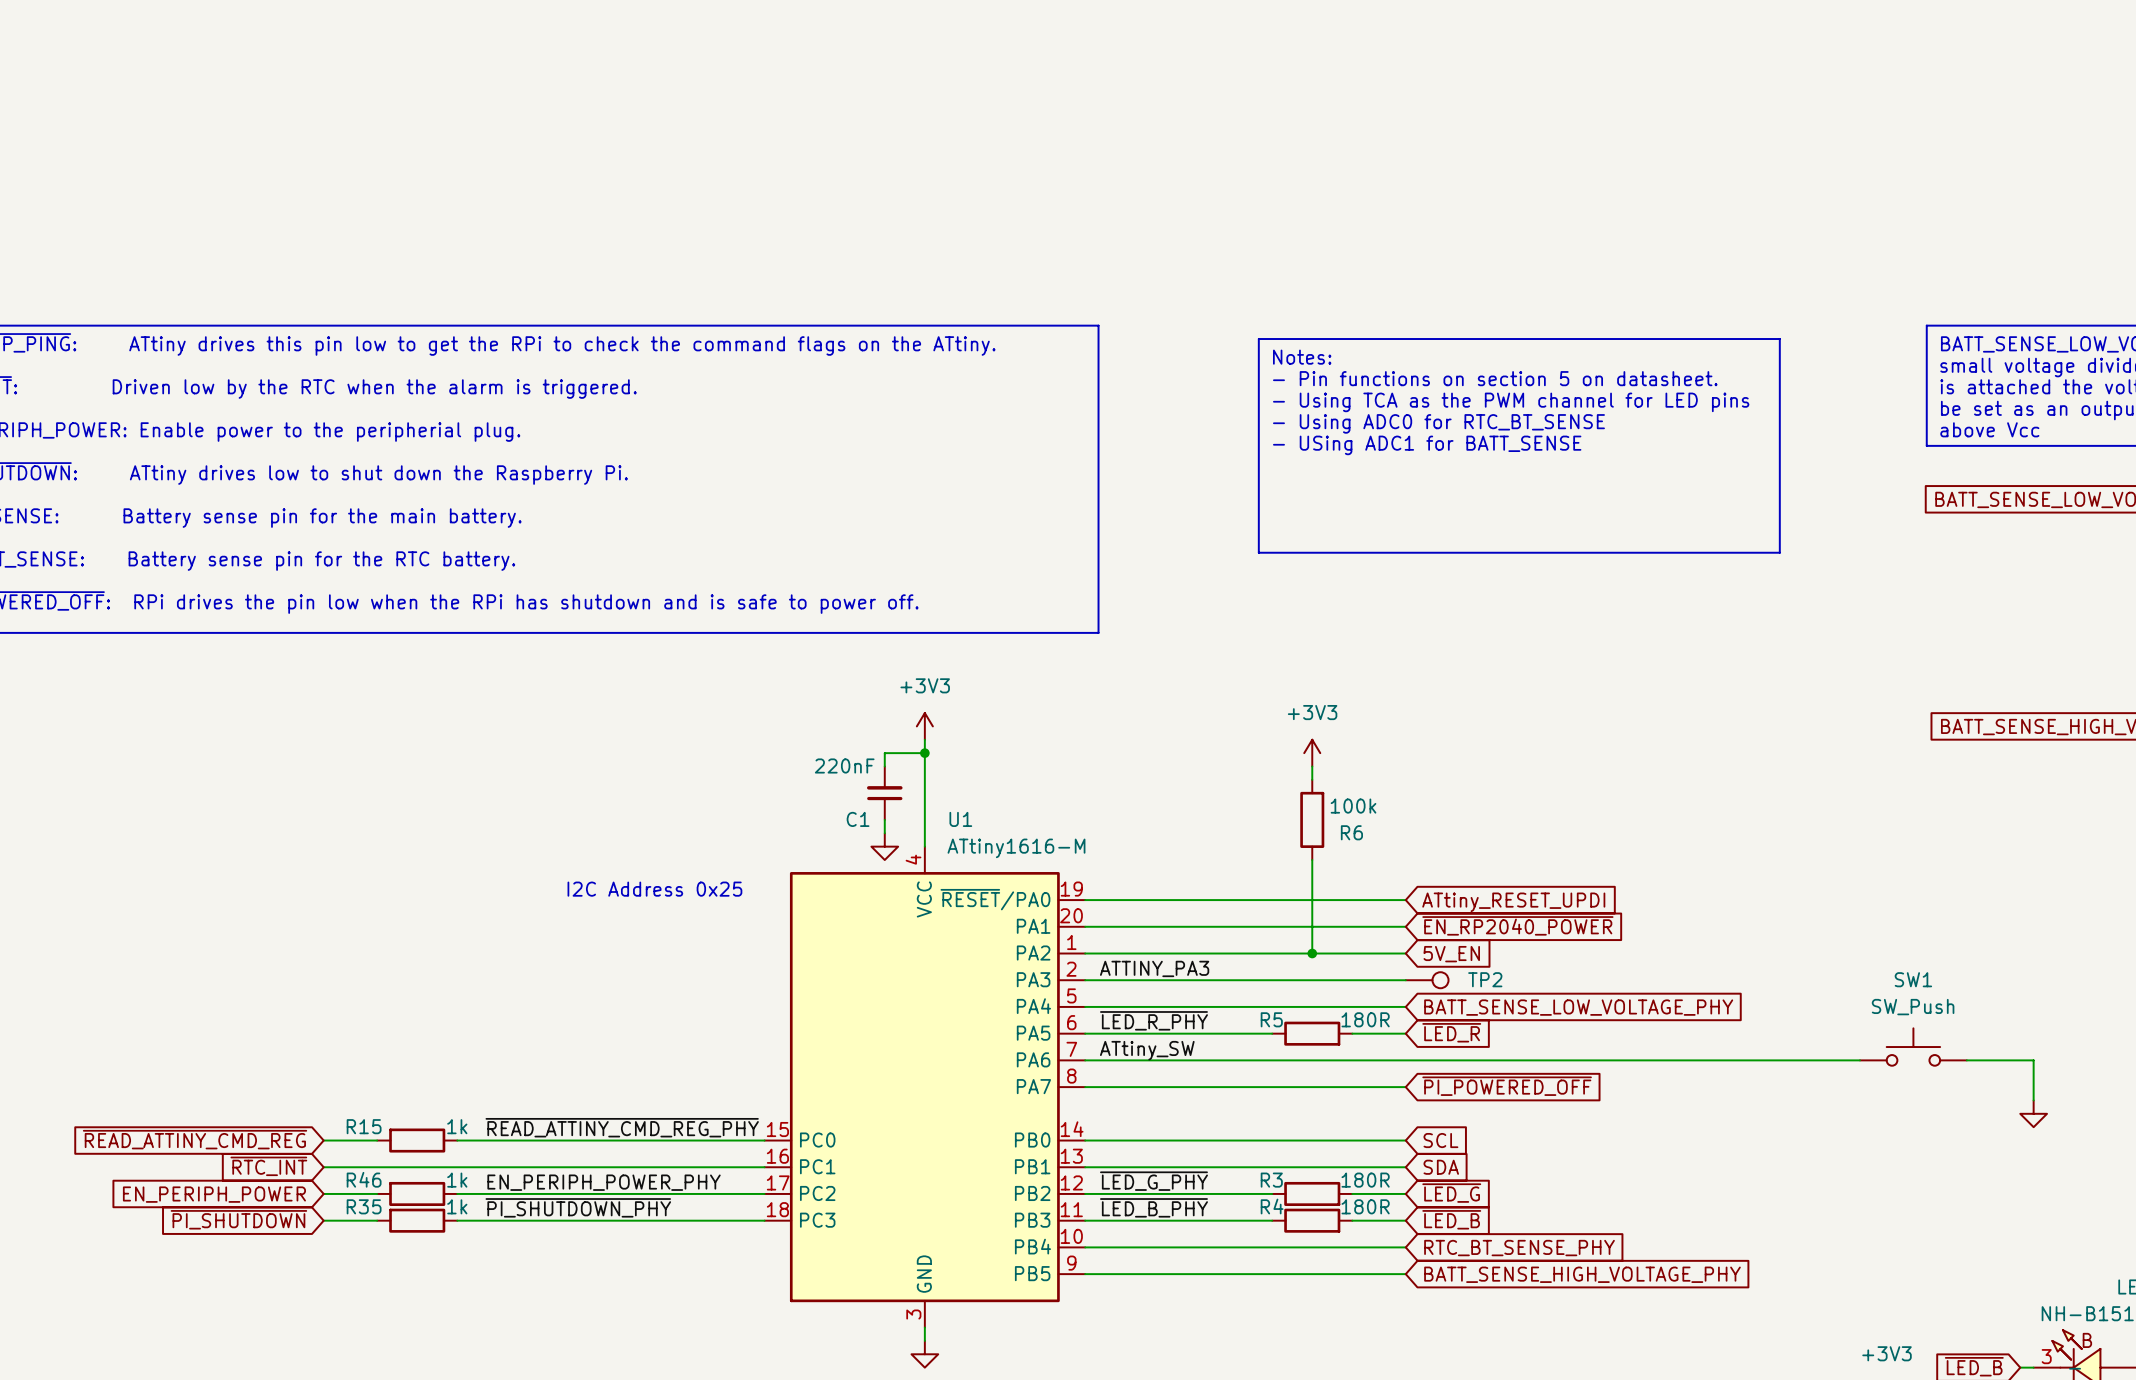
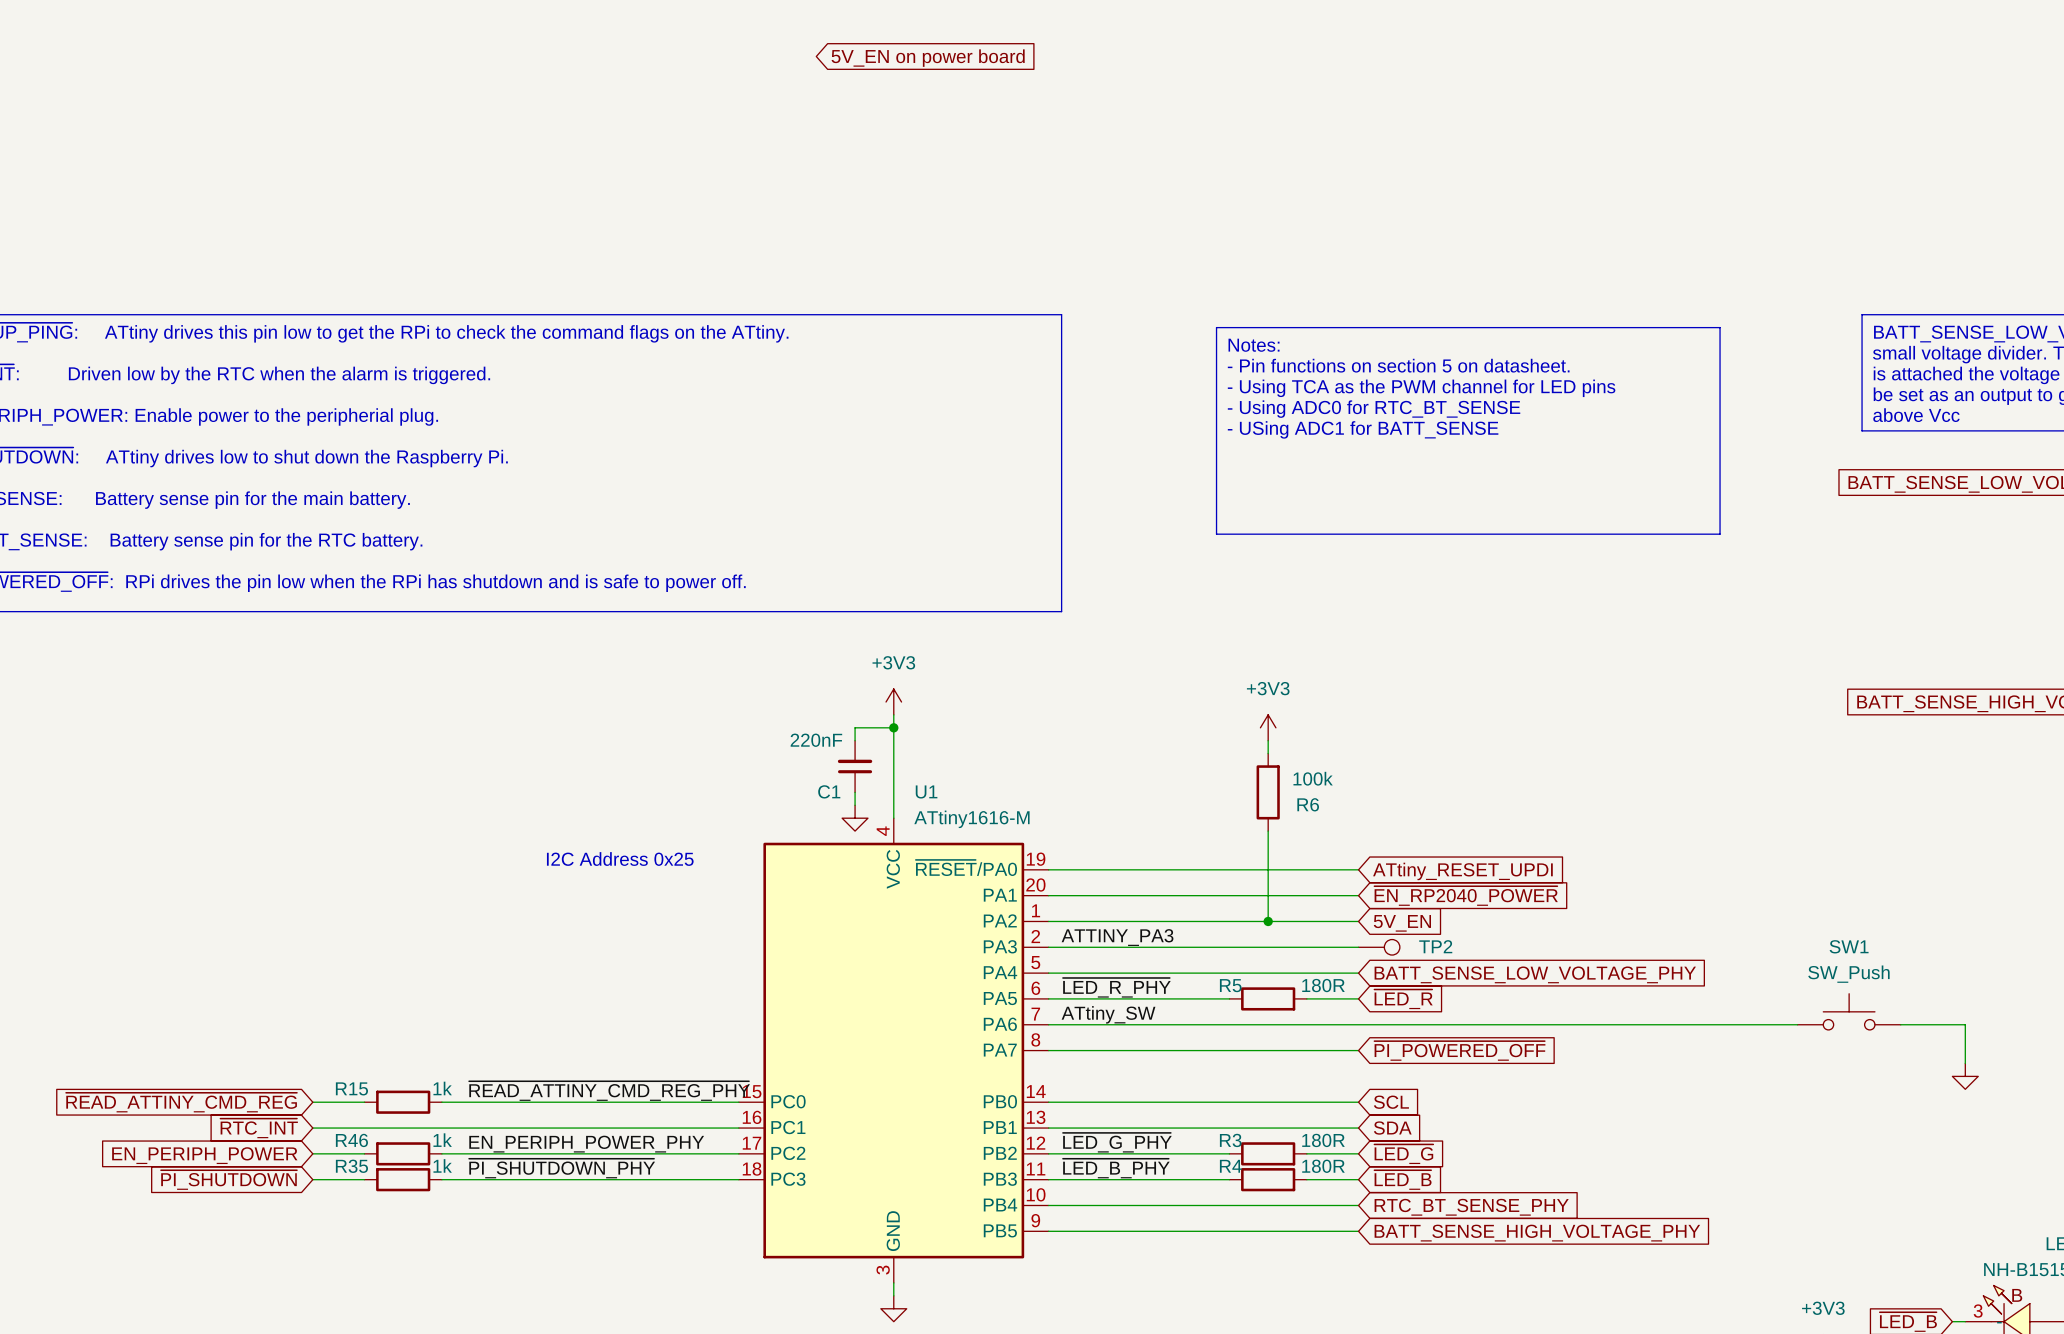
global label: none -> 5V_EN on power board (928, 58)

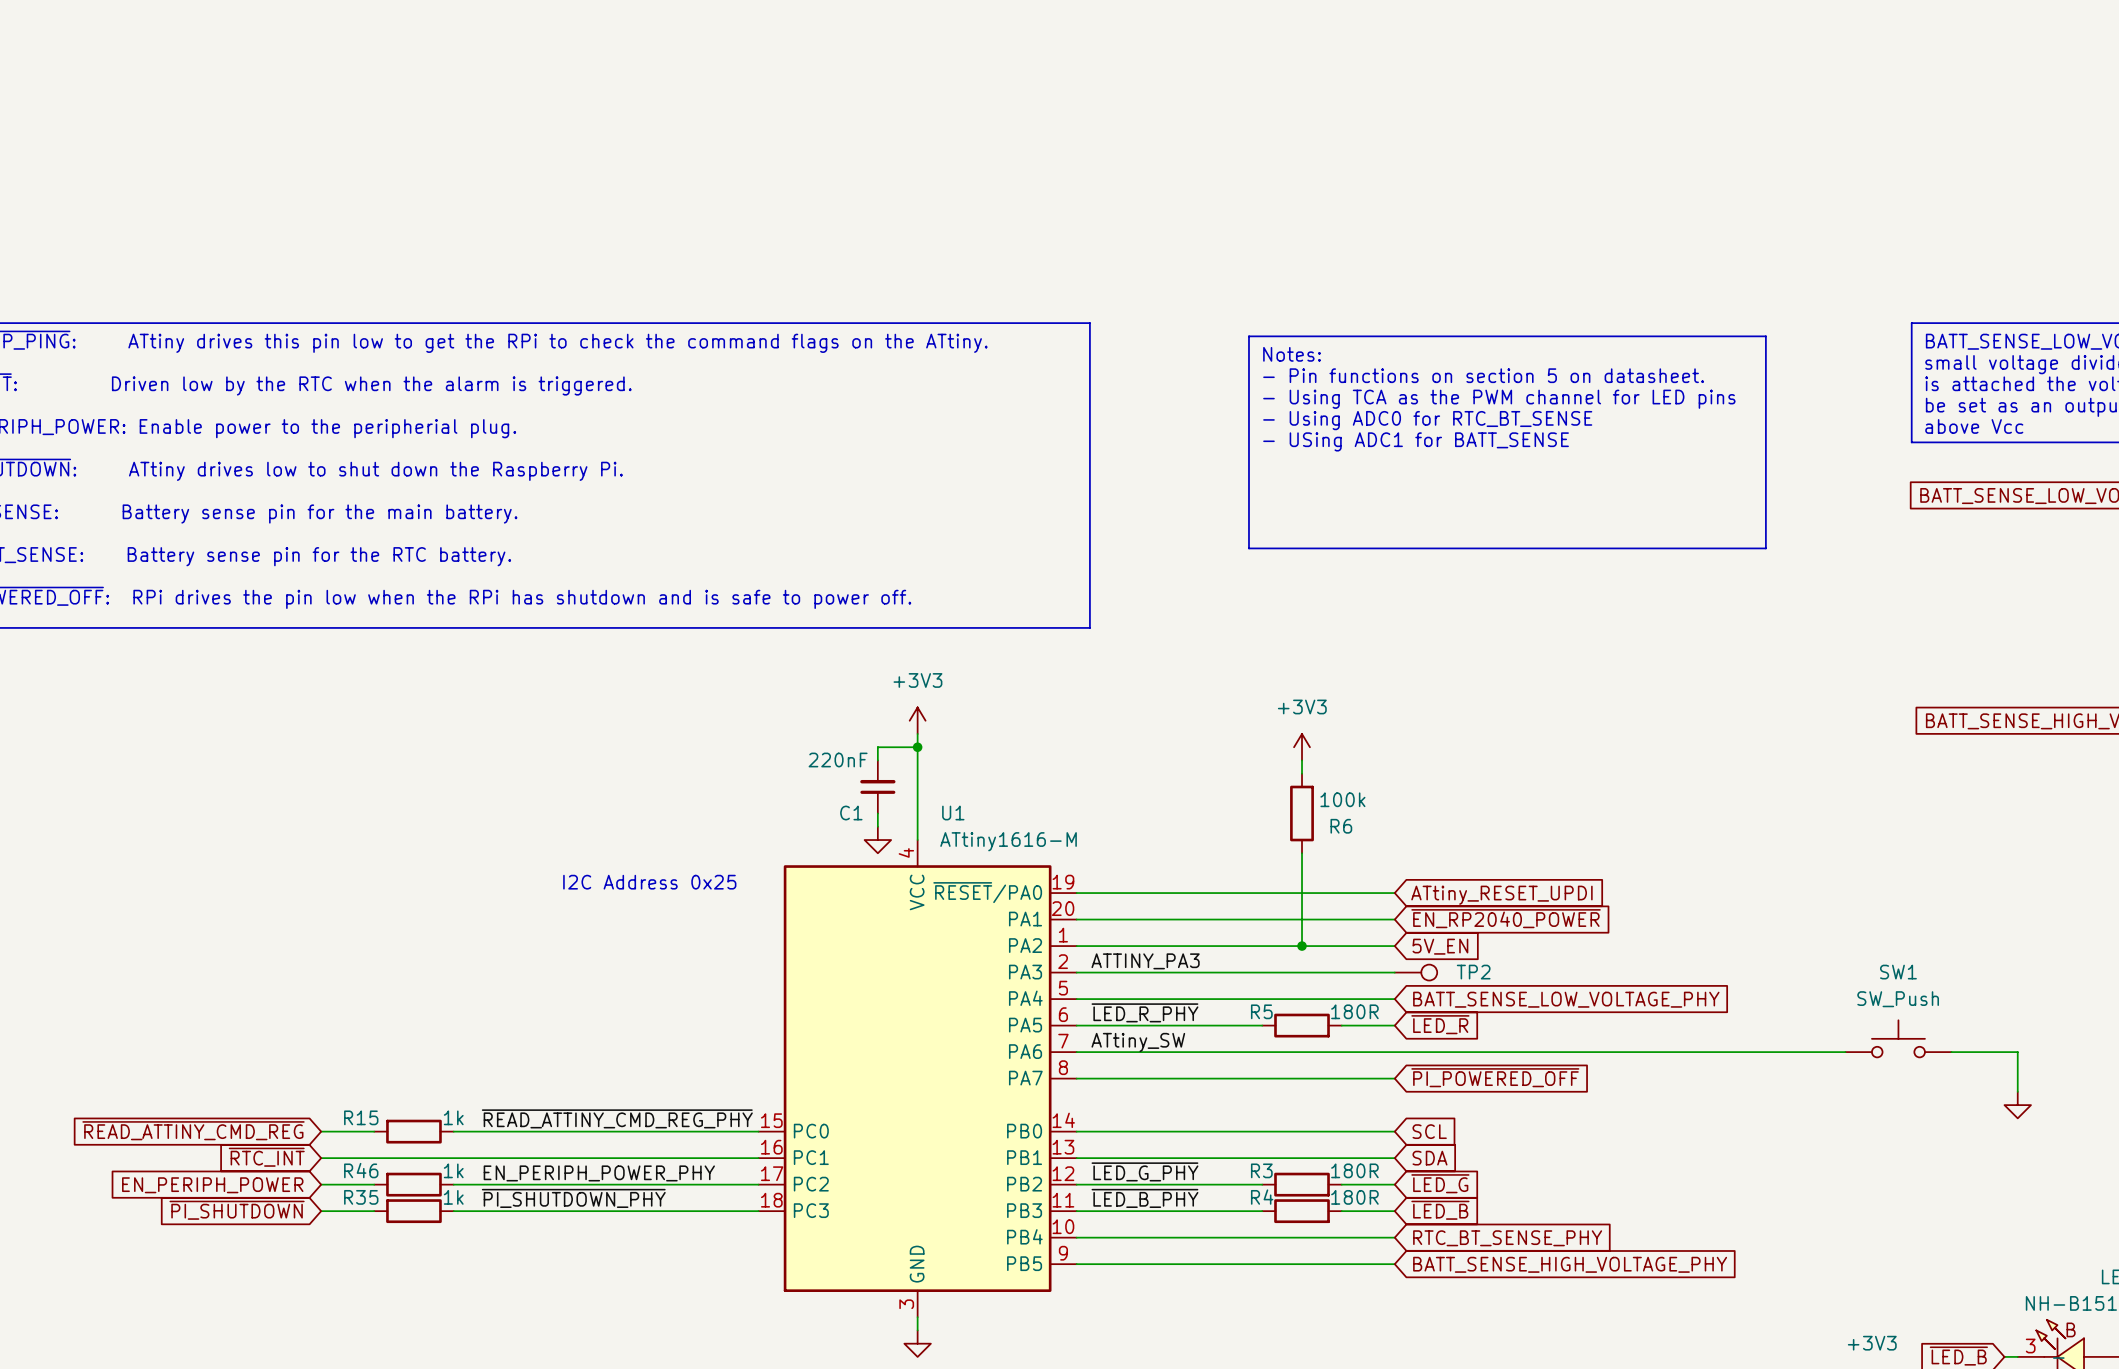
global label: 5V_EN on power board (928, 58) -> none

